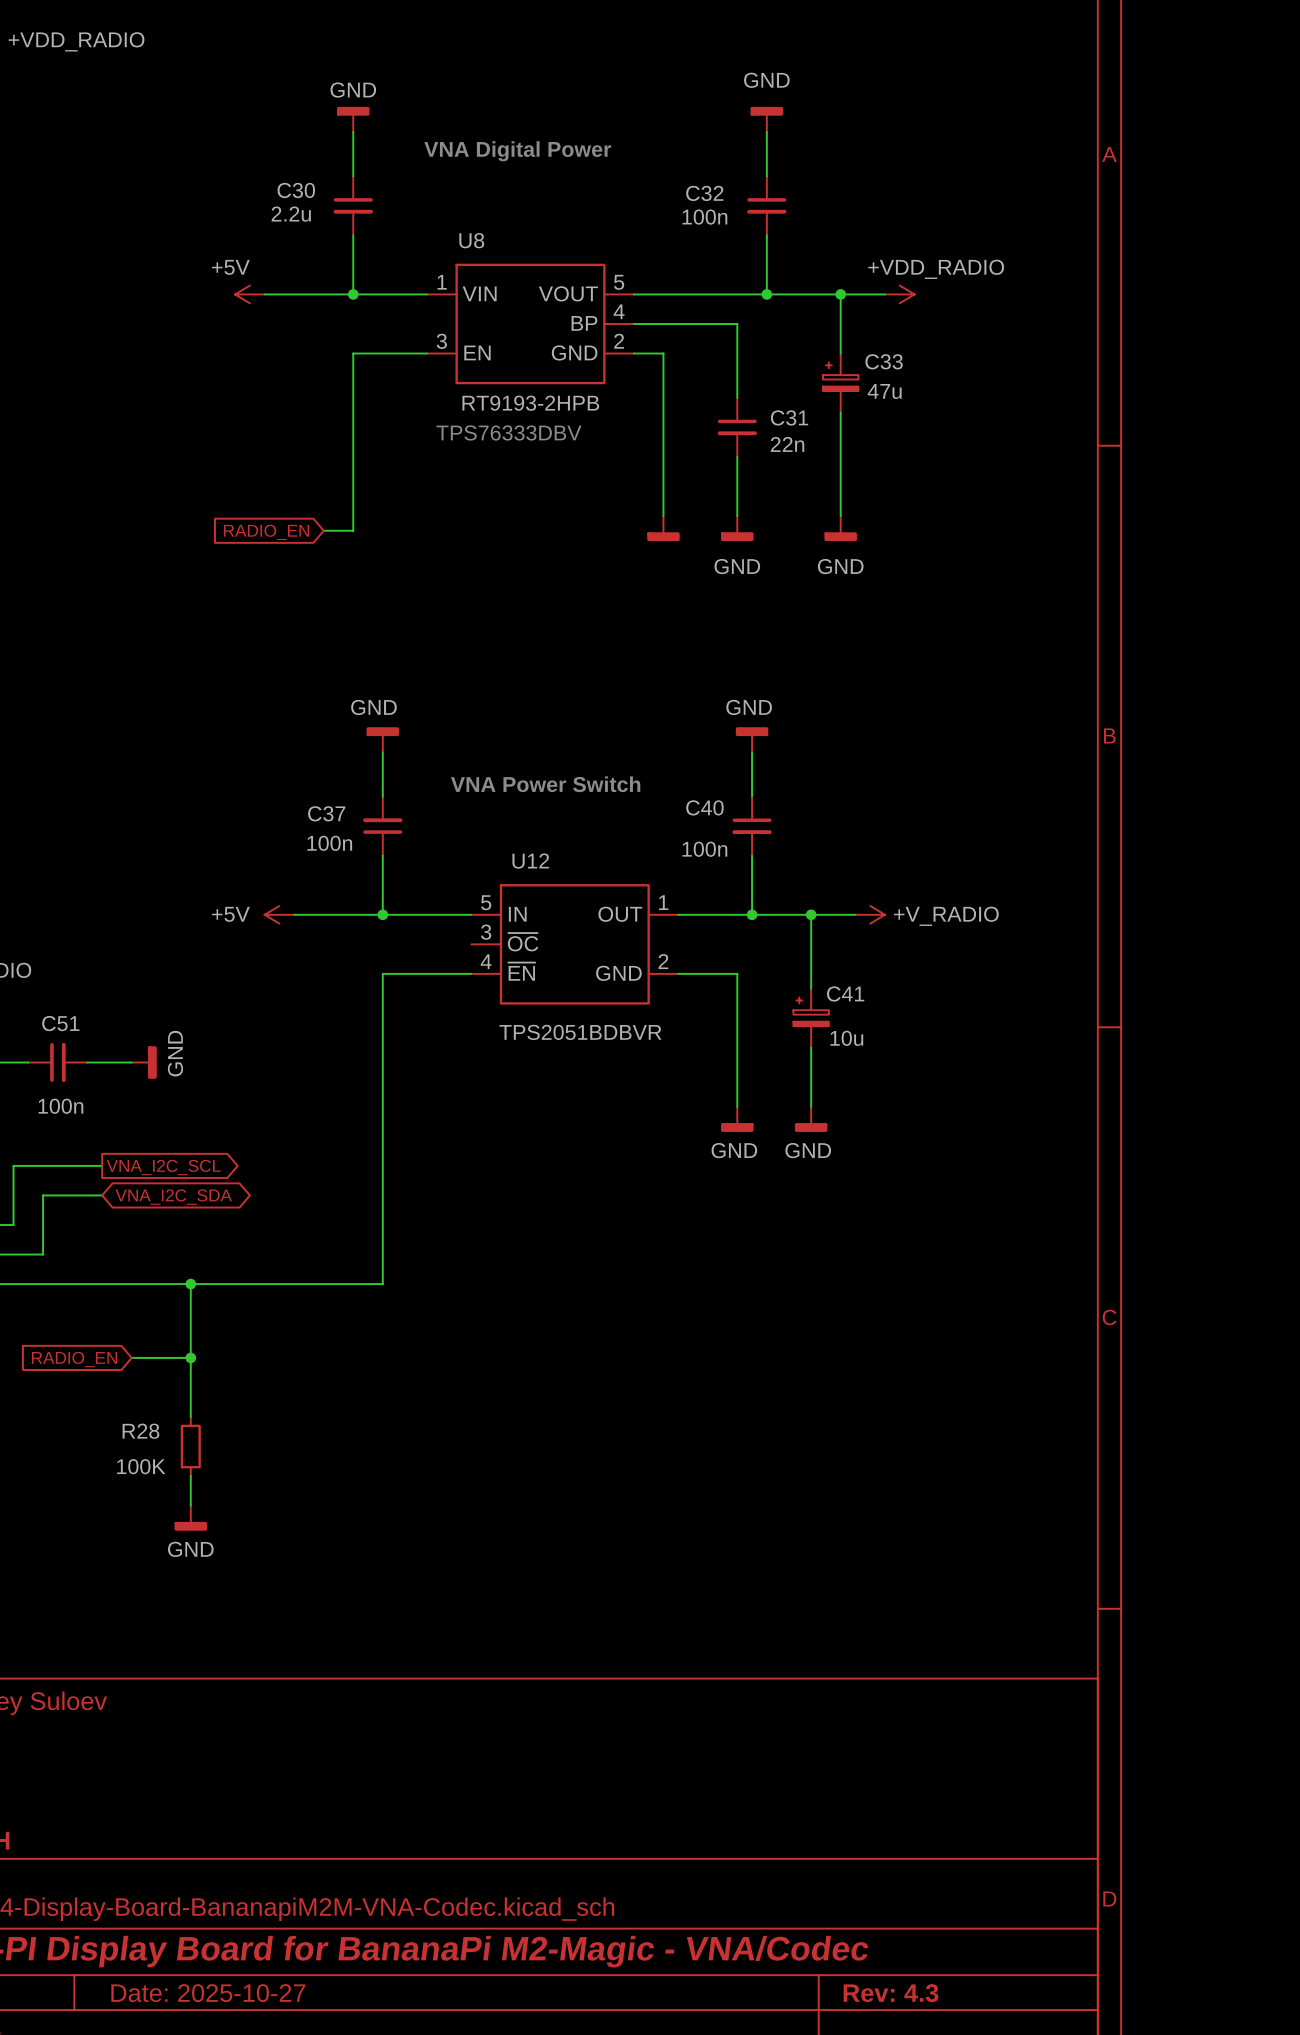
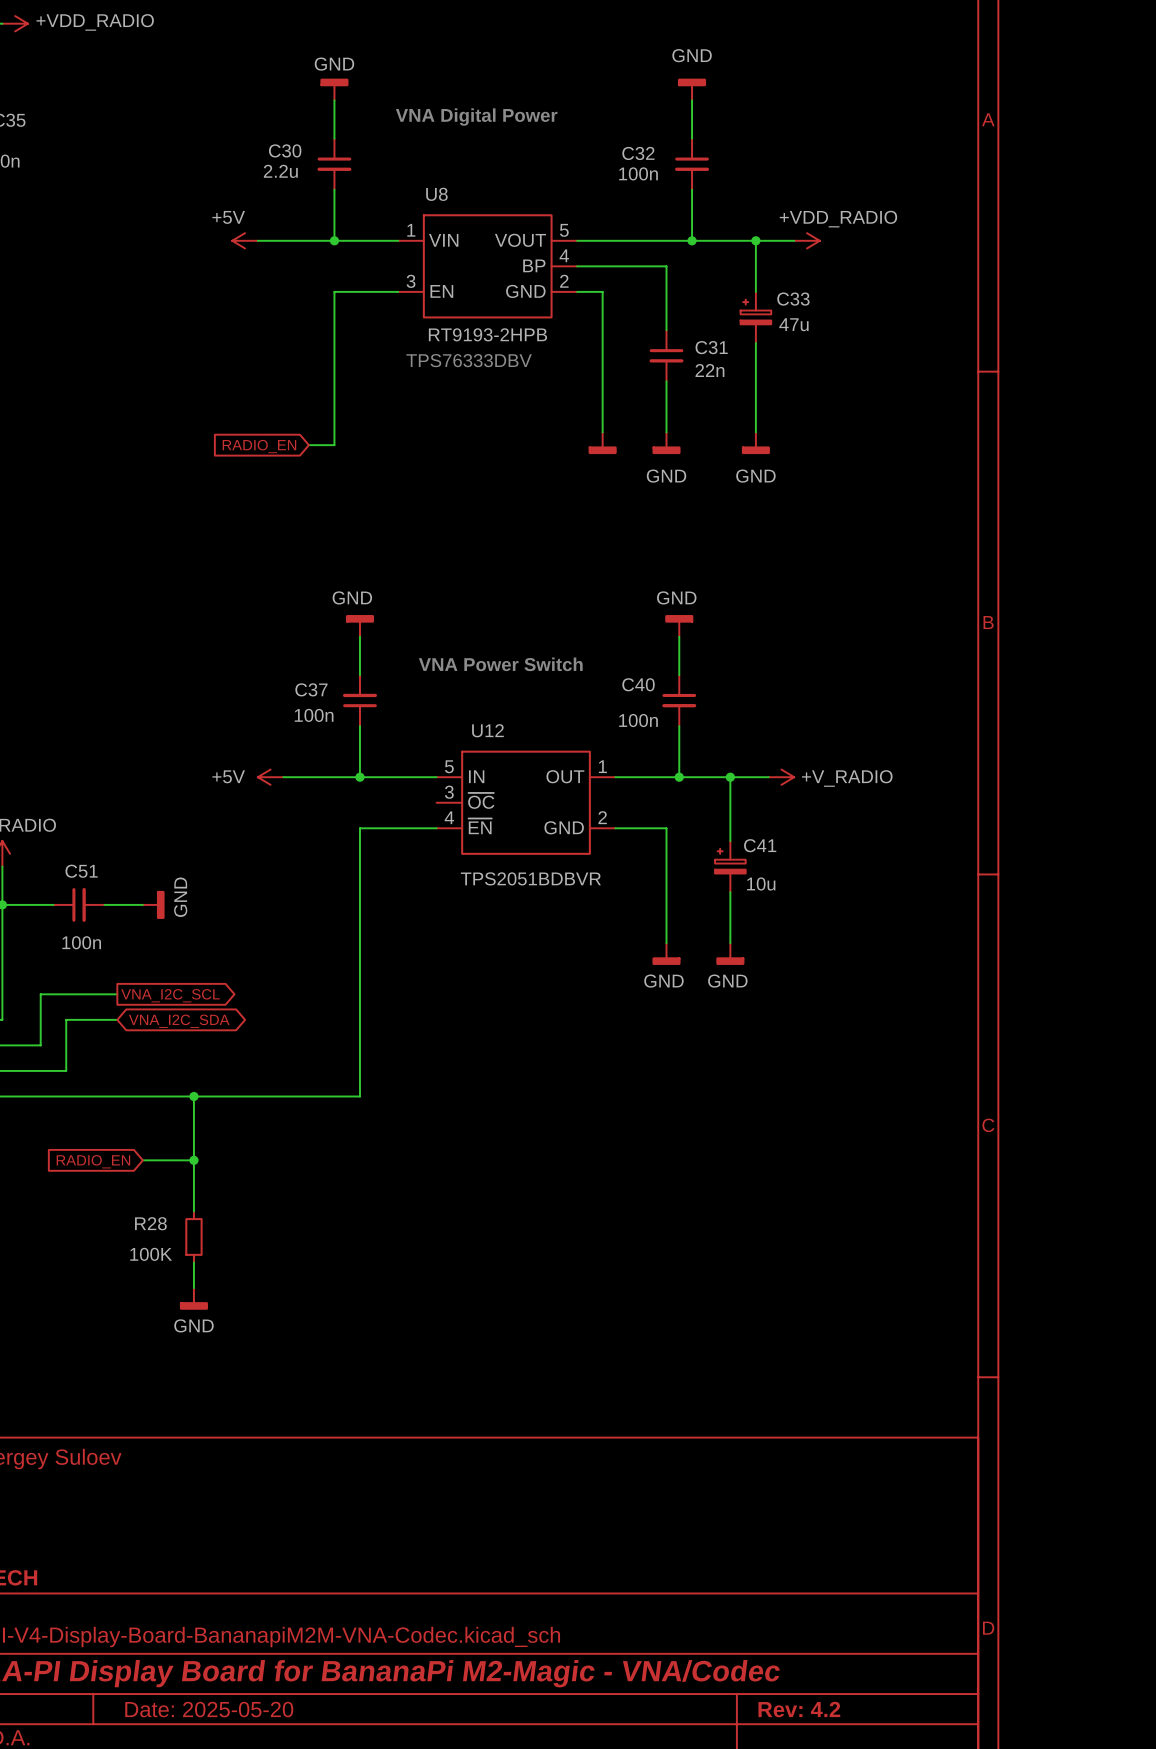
title block: Date: 2025-10-27 (208, 1993) -> Date: 2025-05-20 (209, 1709)
title block: Rev: 4.3 (890, 1993) -> Rev: 4.2 (799, 1709)

